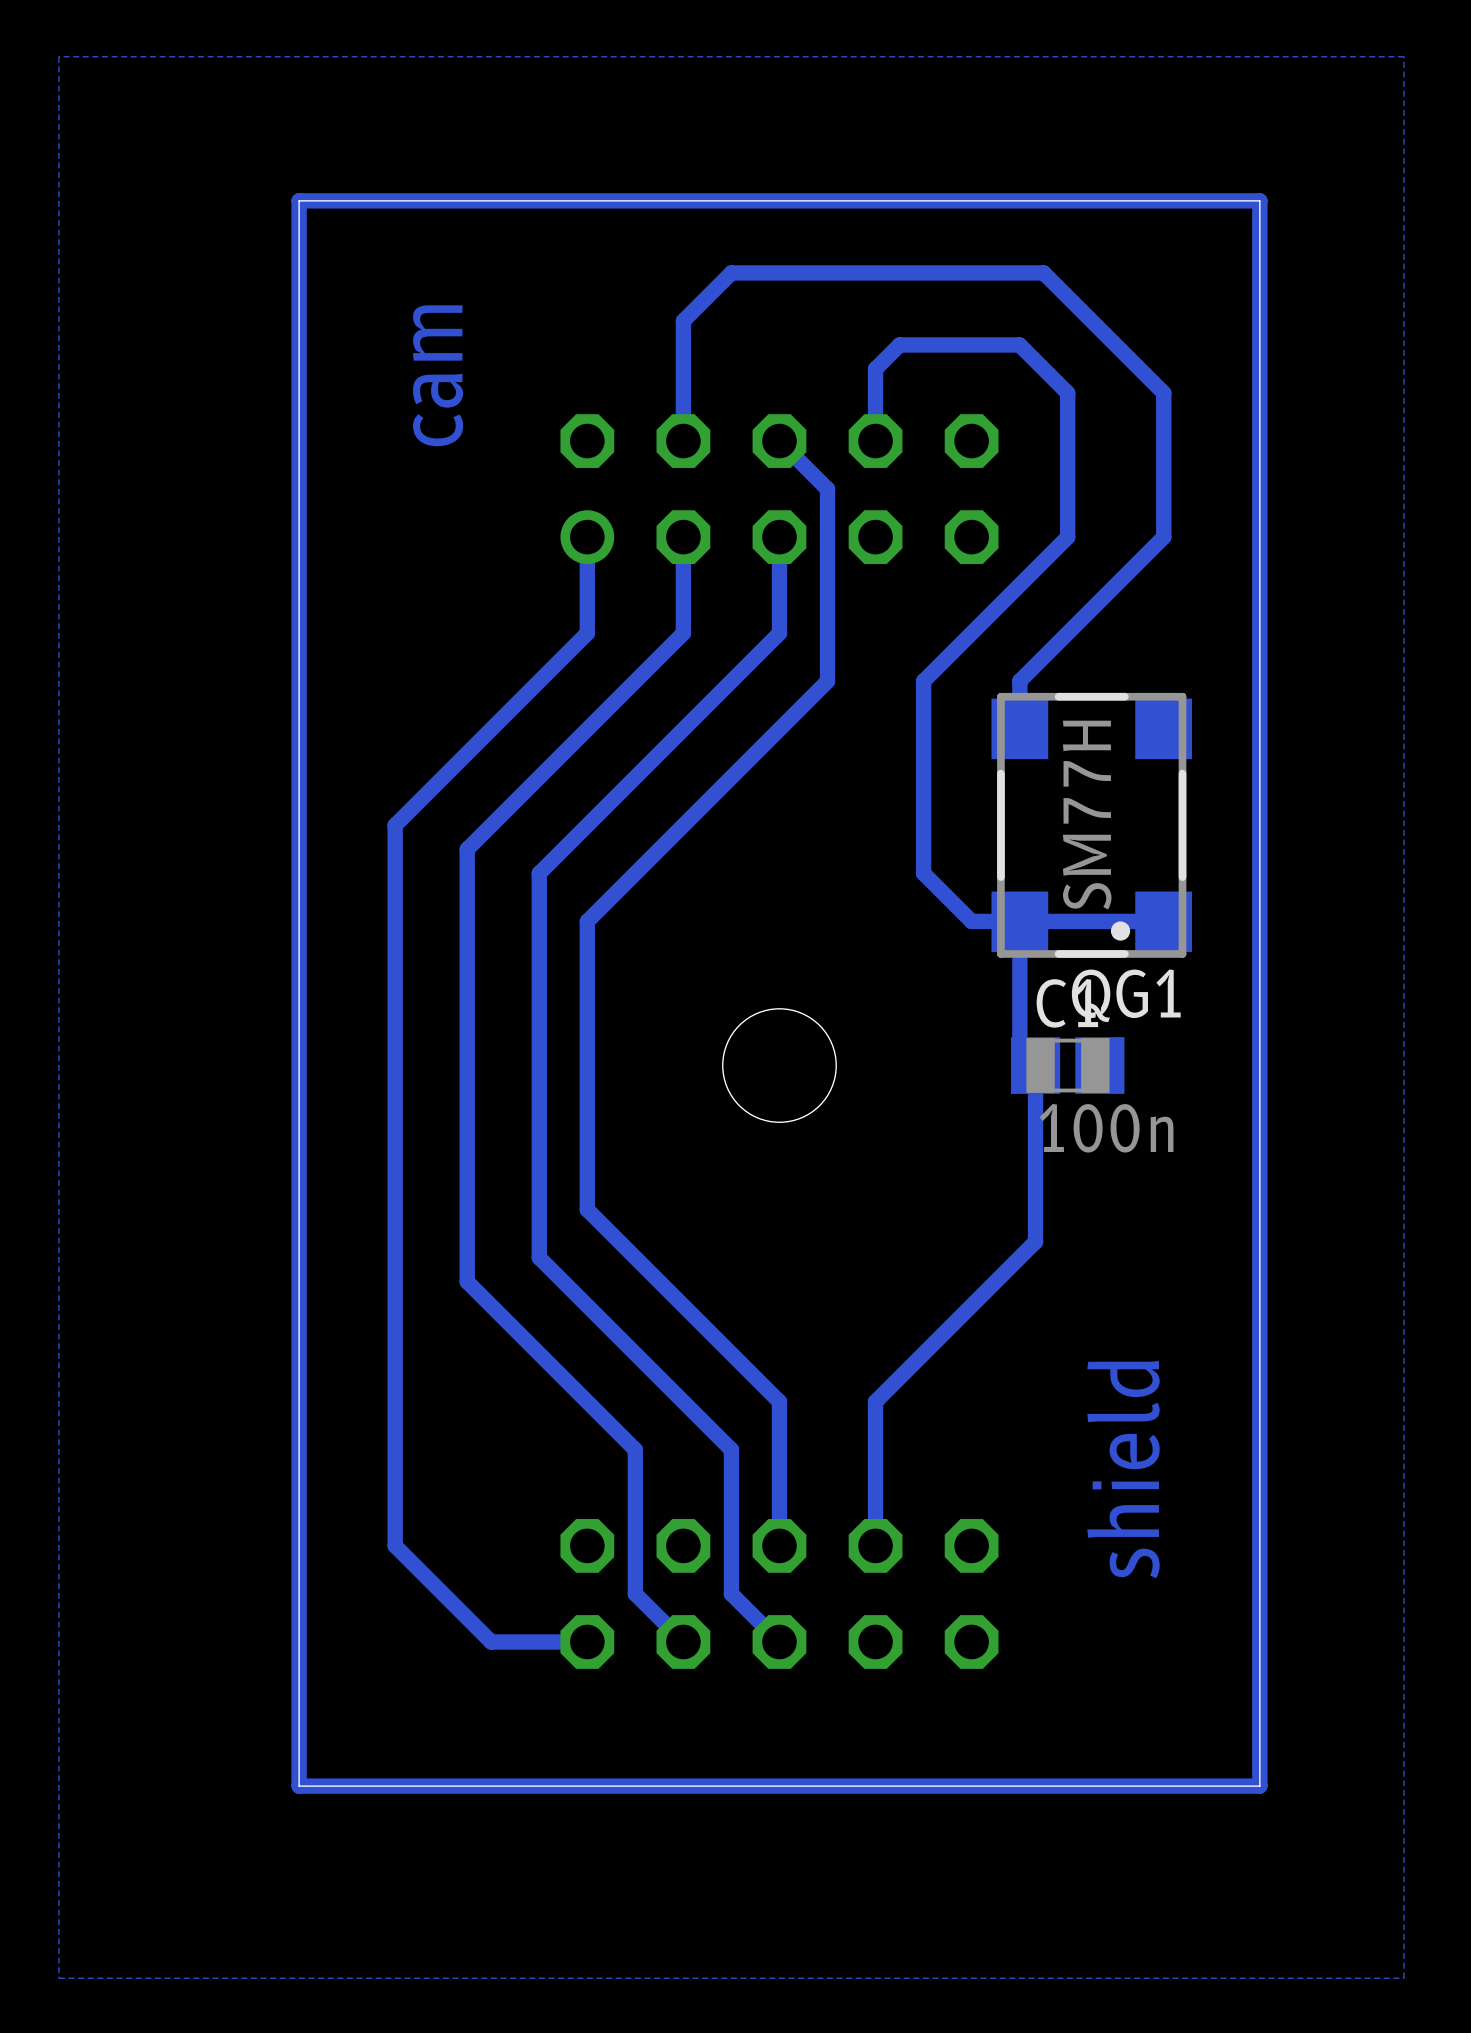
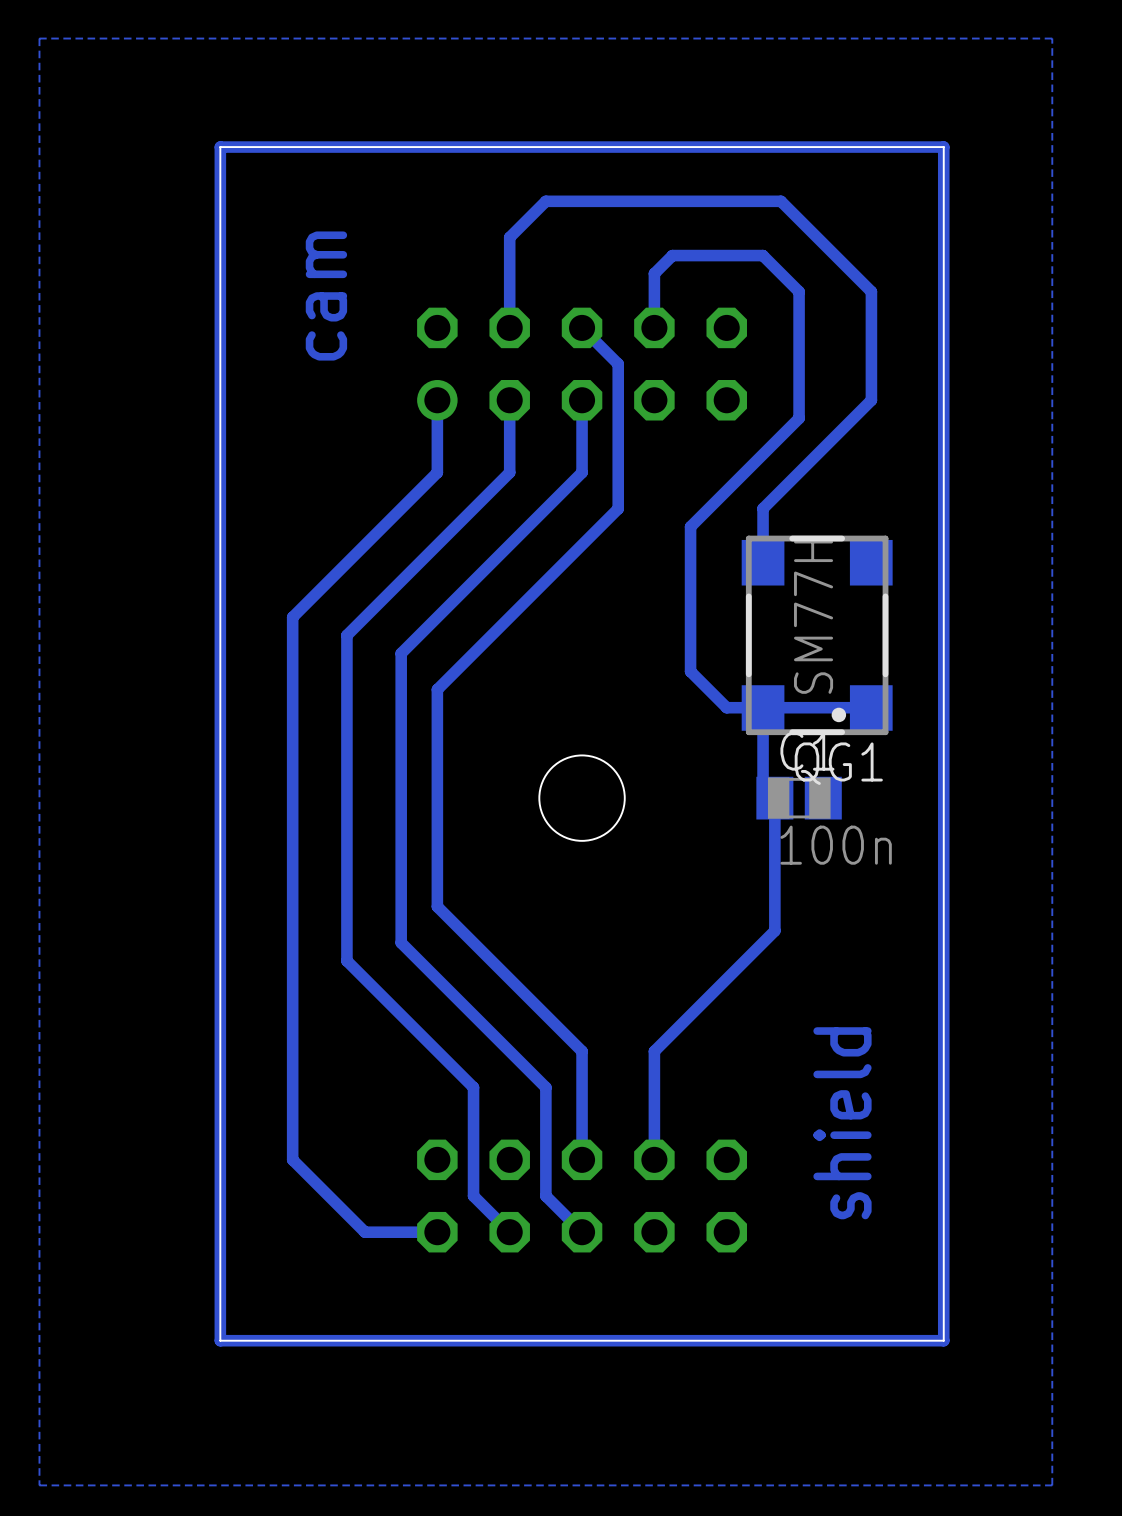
bottom track: (1067, 537) (923, 681) (923, 705) -> (799, 400) (799, 418) (690, 526)
QG1 position: (1091, 825) -> (817, 635)
bottom track: (923, 873) (971, 921) (1163, 921) -> (690, 653) (690, 671) (726, 707) (870, 707)

